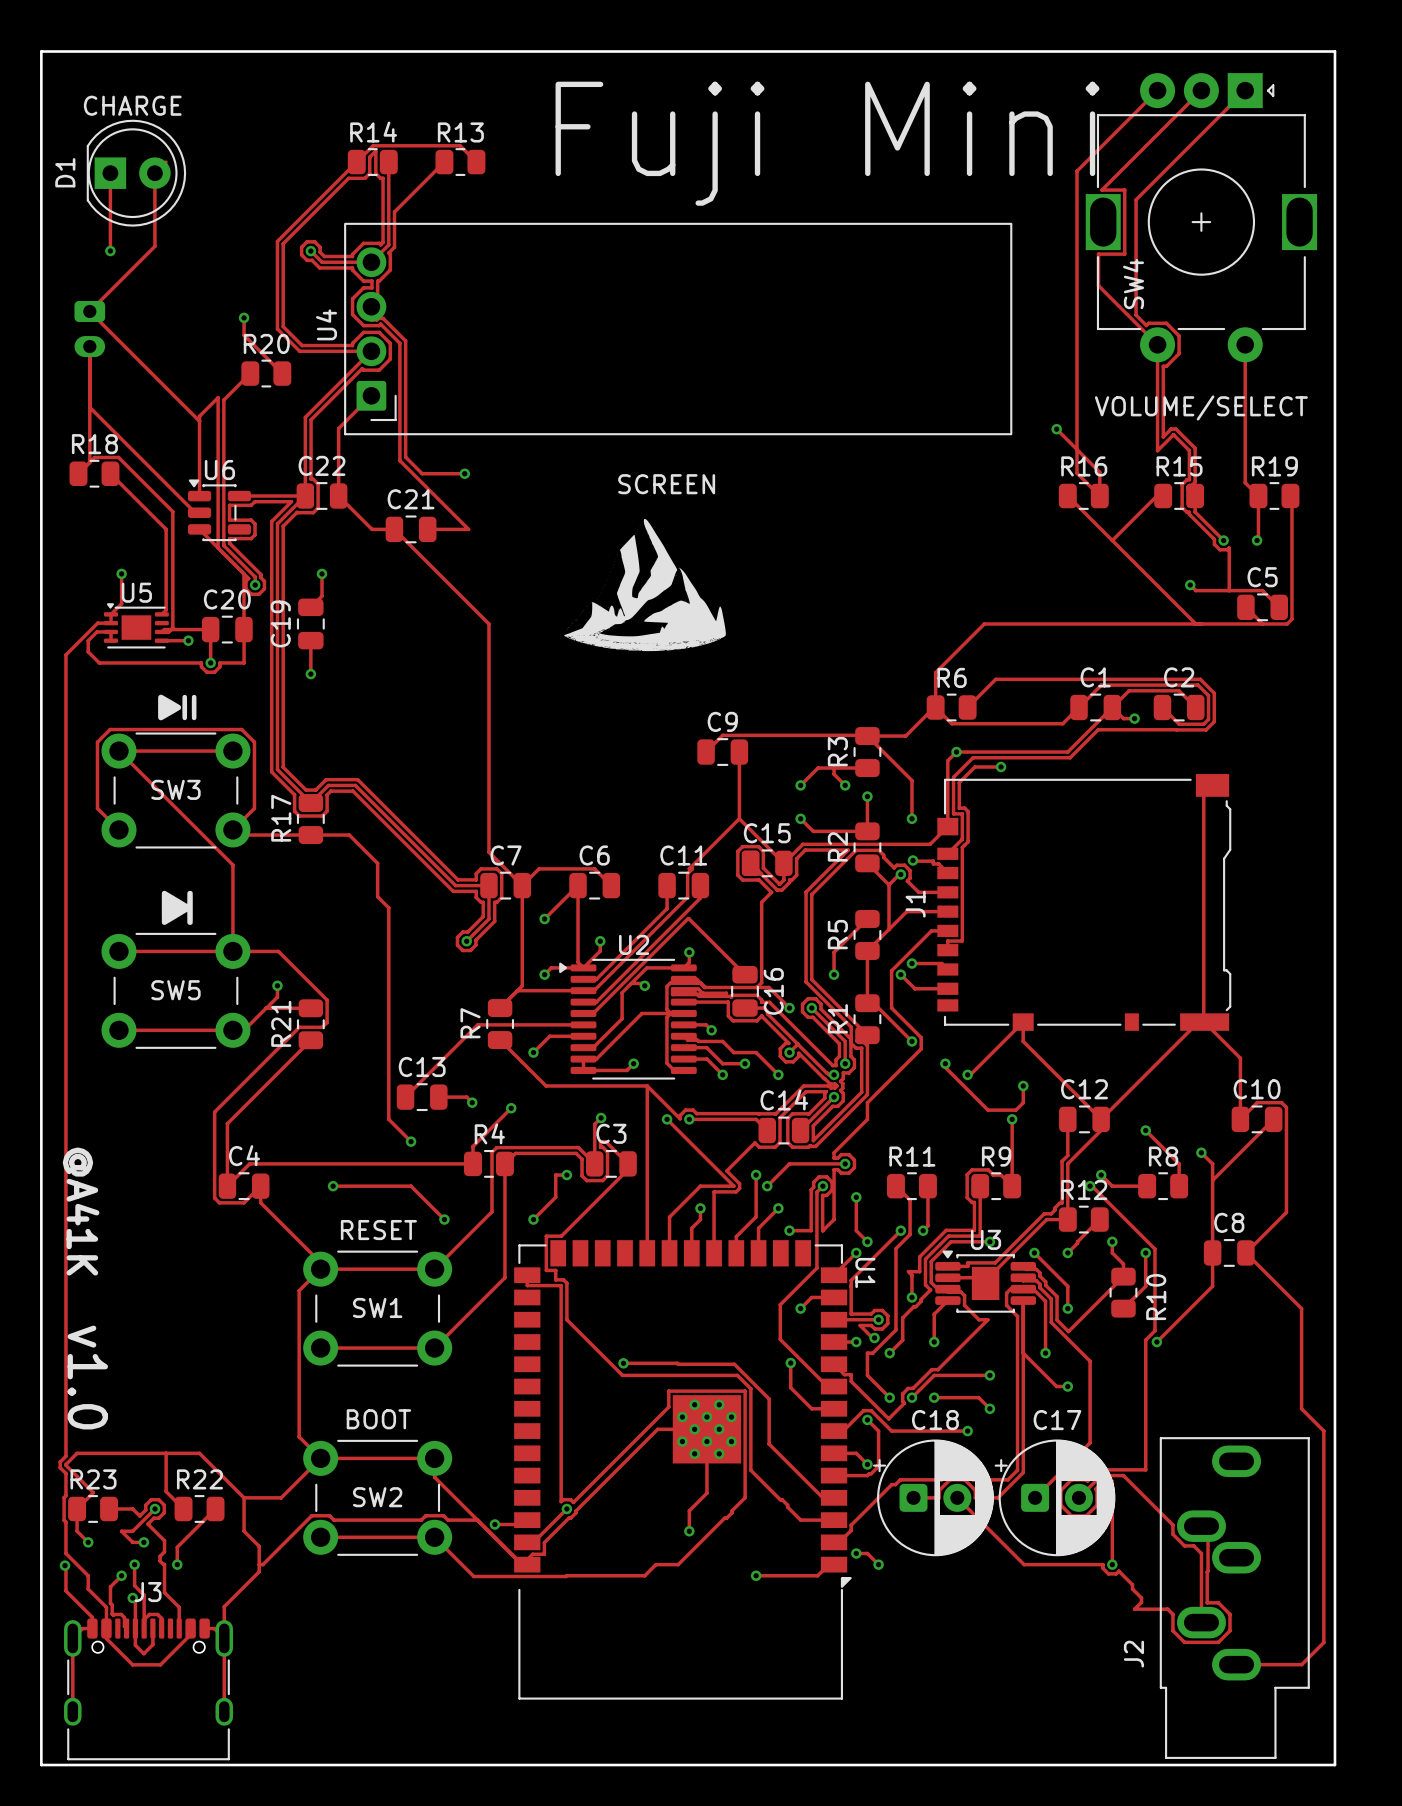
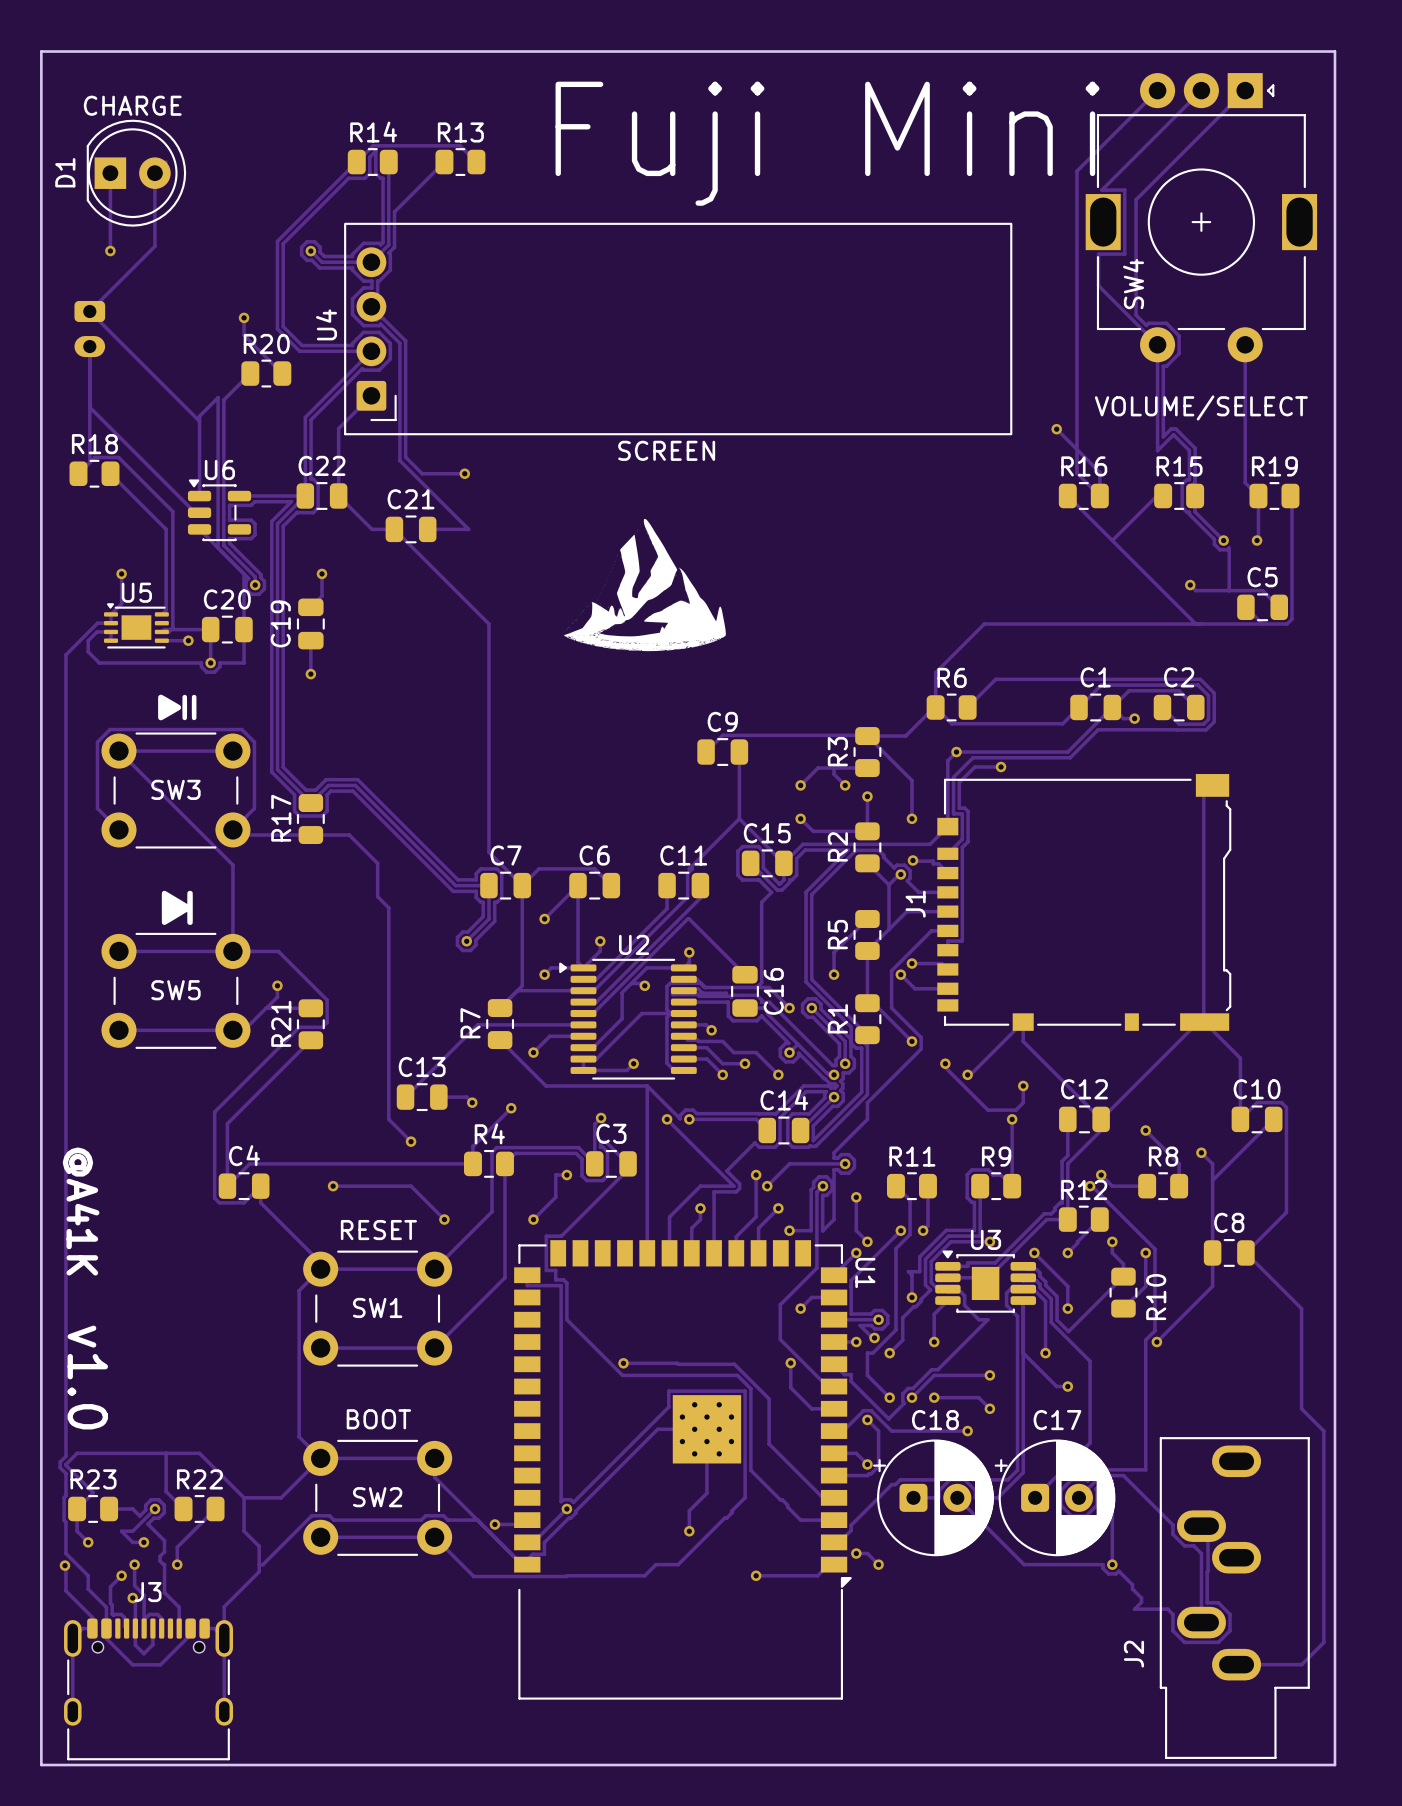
text position: SCREEN (666, 484) -> SCREEN (666, 450)

